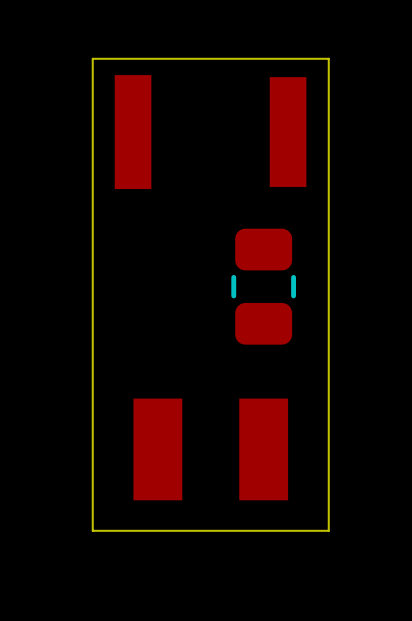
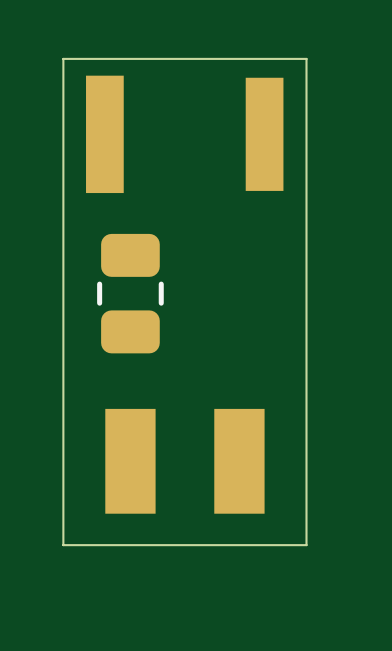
part position: (263, 286) -> (130, 293)

